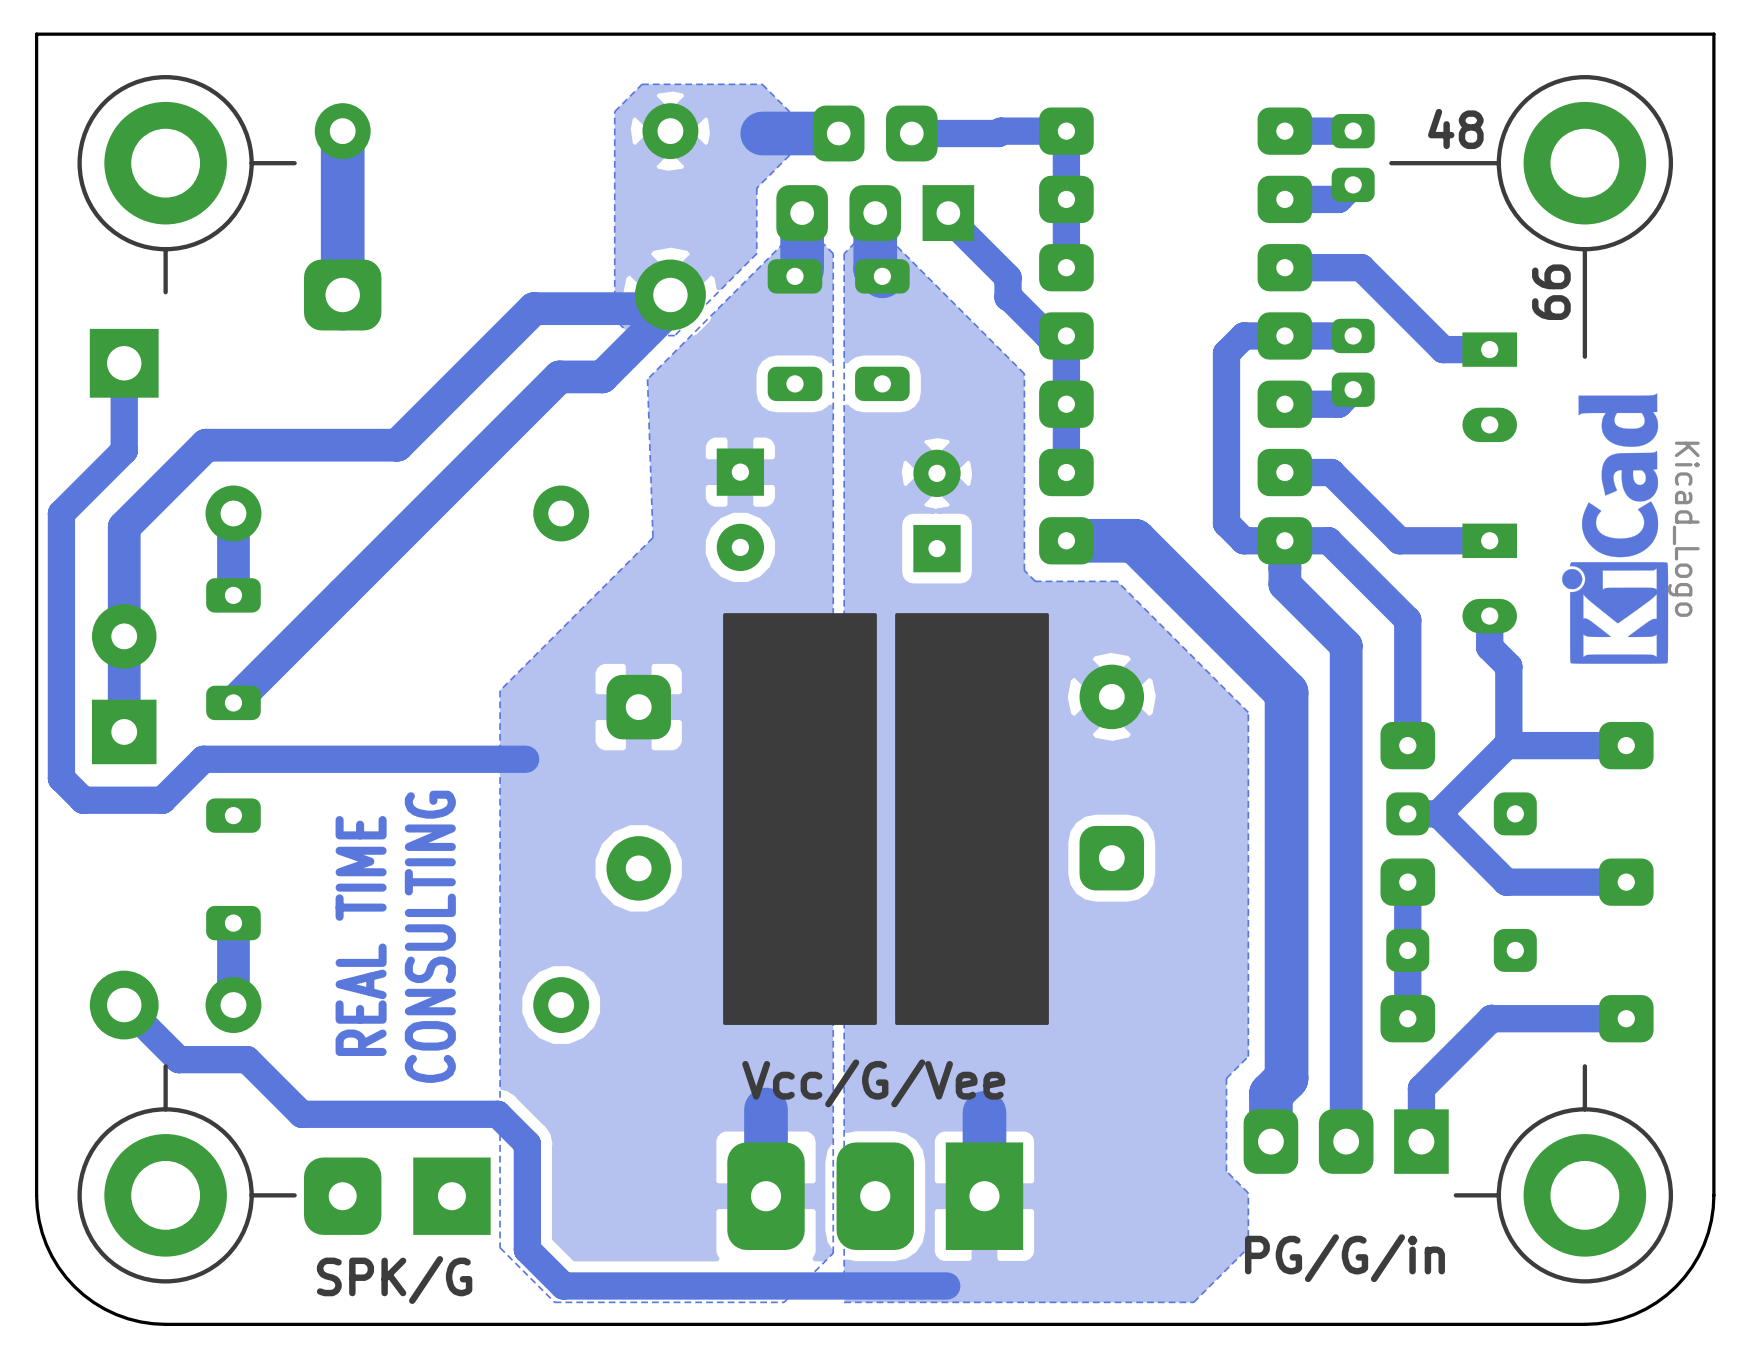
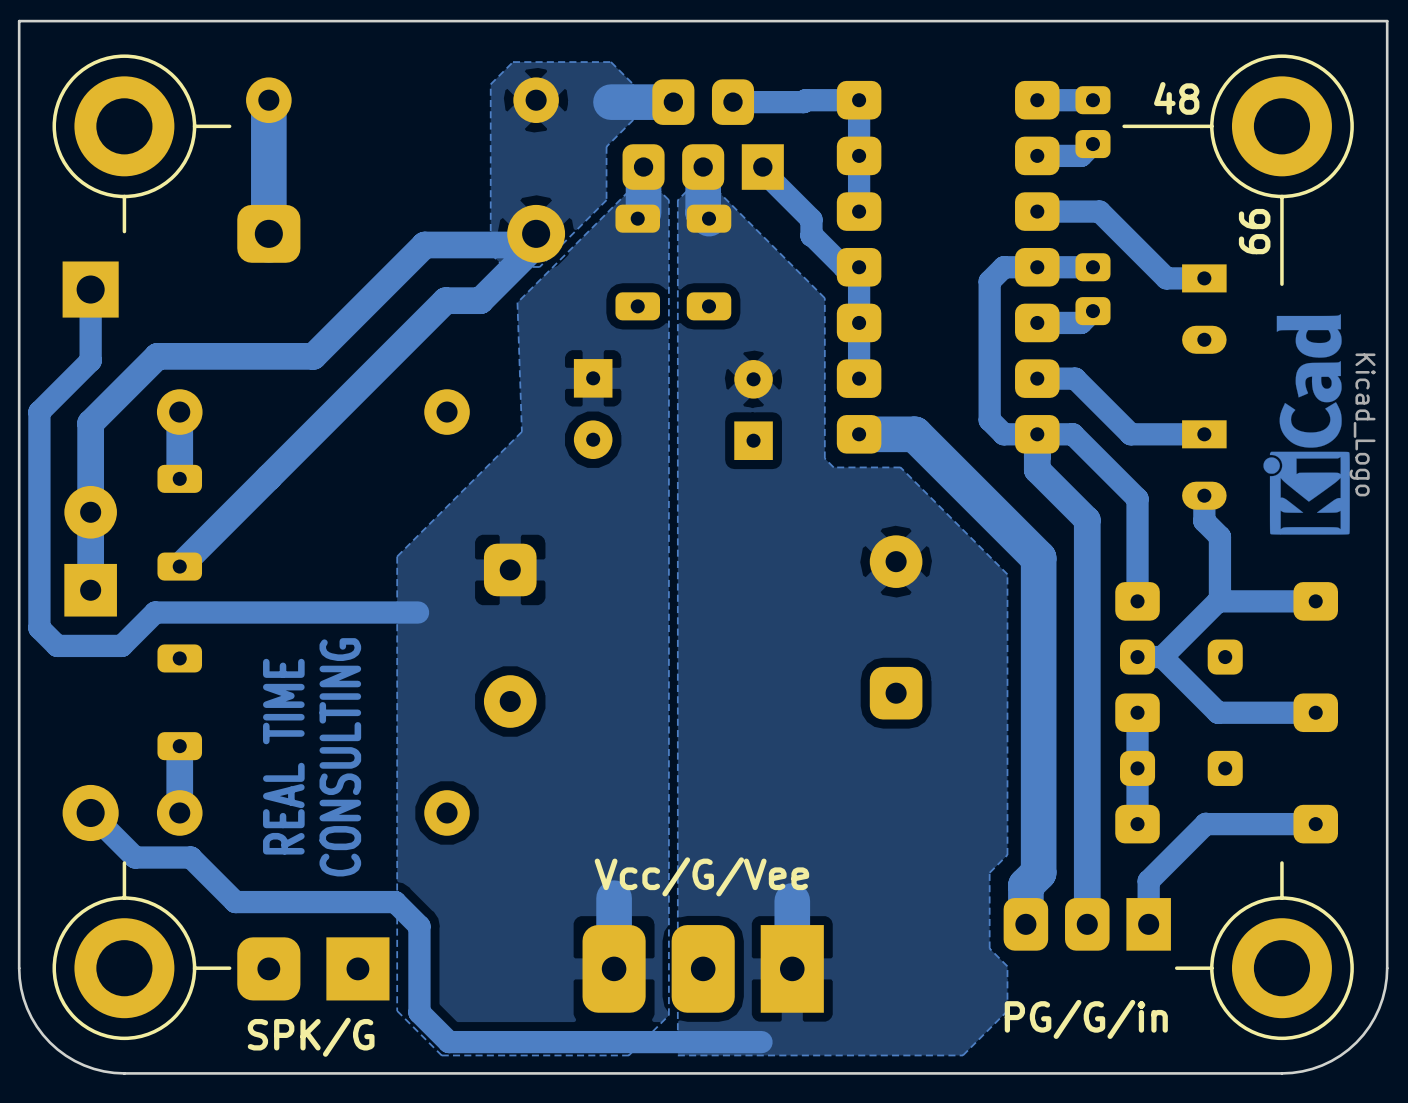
drawing: [723, 613, 1049, 1025] -> none

